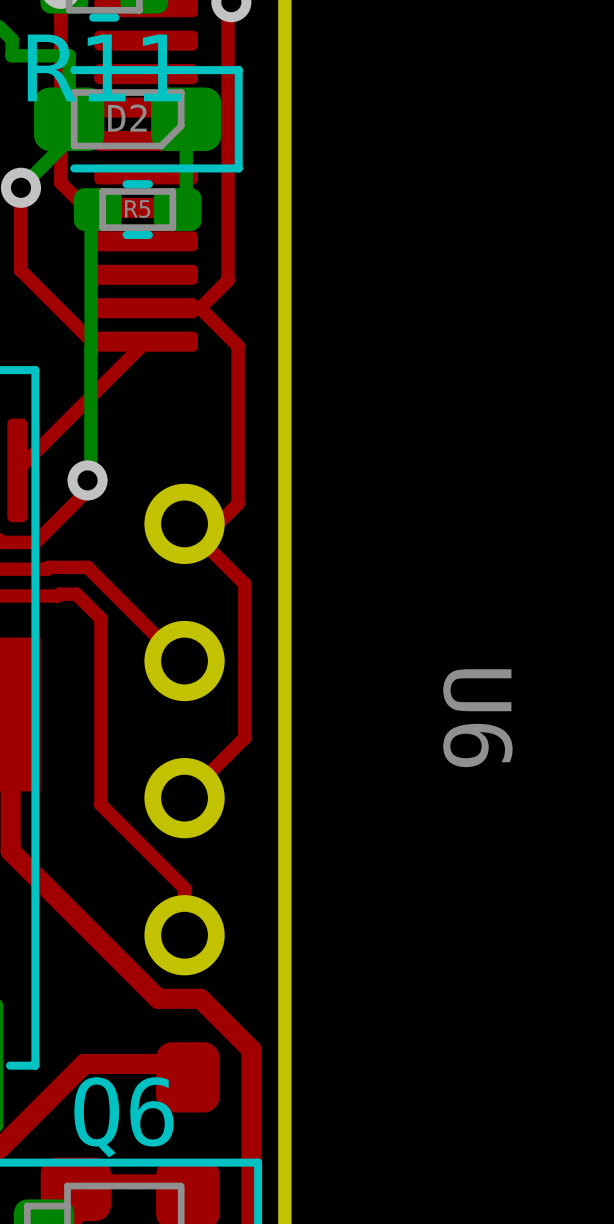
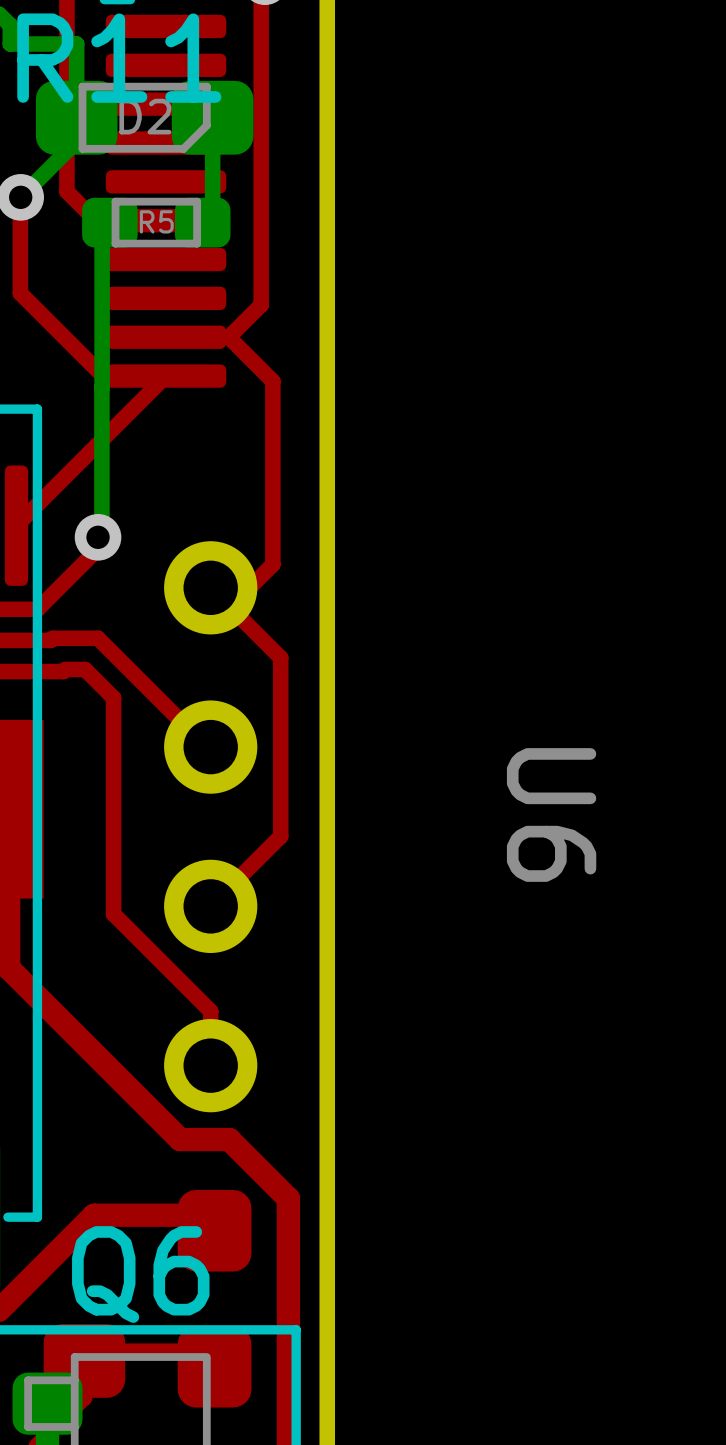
D2 footprint: [34, 66, 243, 173] -> [35, 80, 254, 155]
R5 footprint: [73, 180, 202, 239] -> [82, 197, 231, 248]

